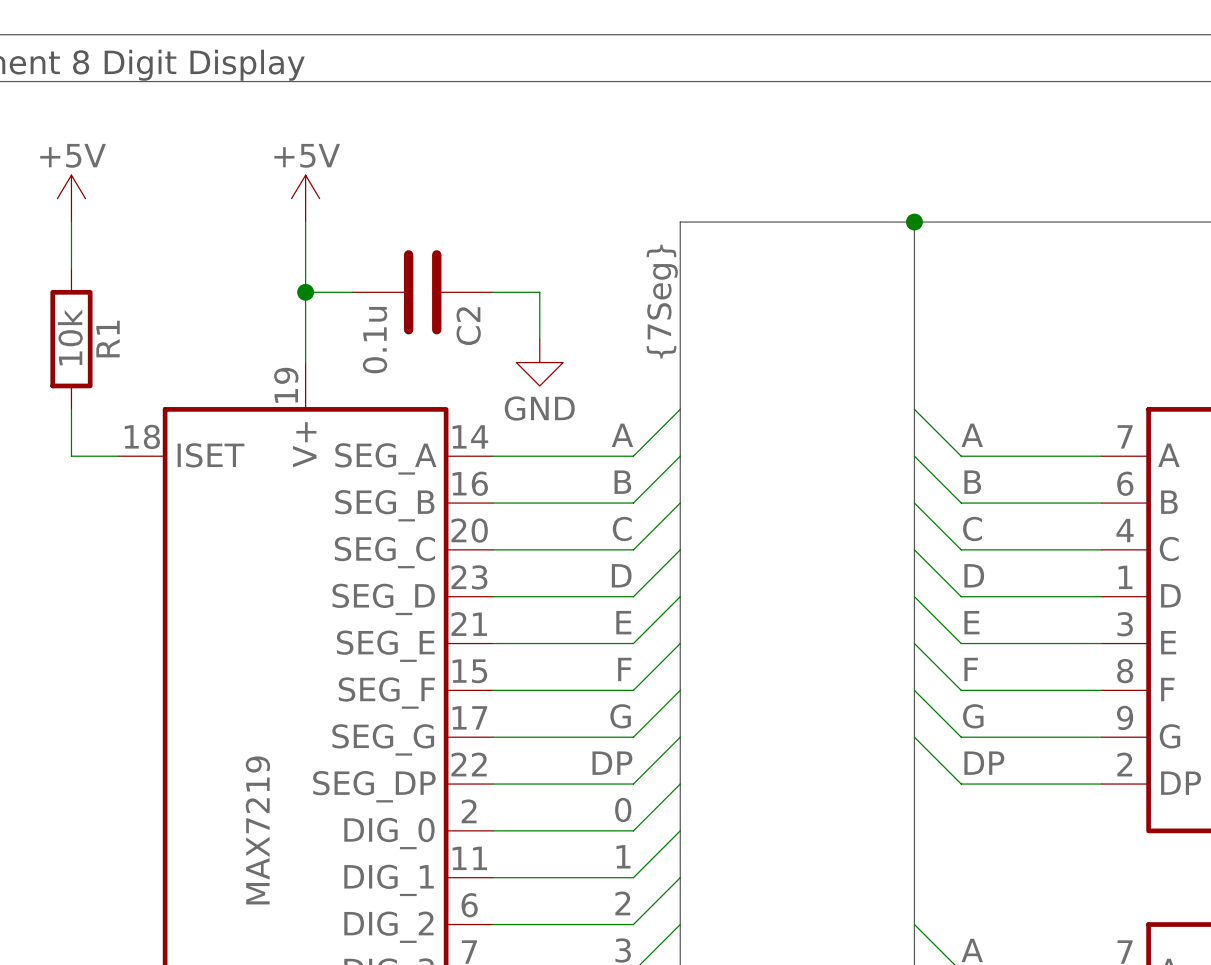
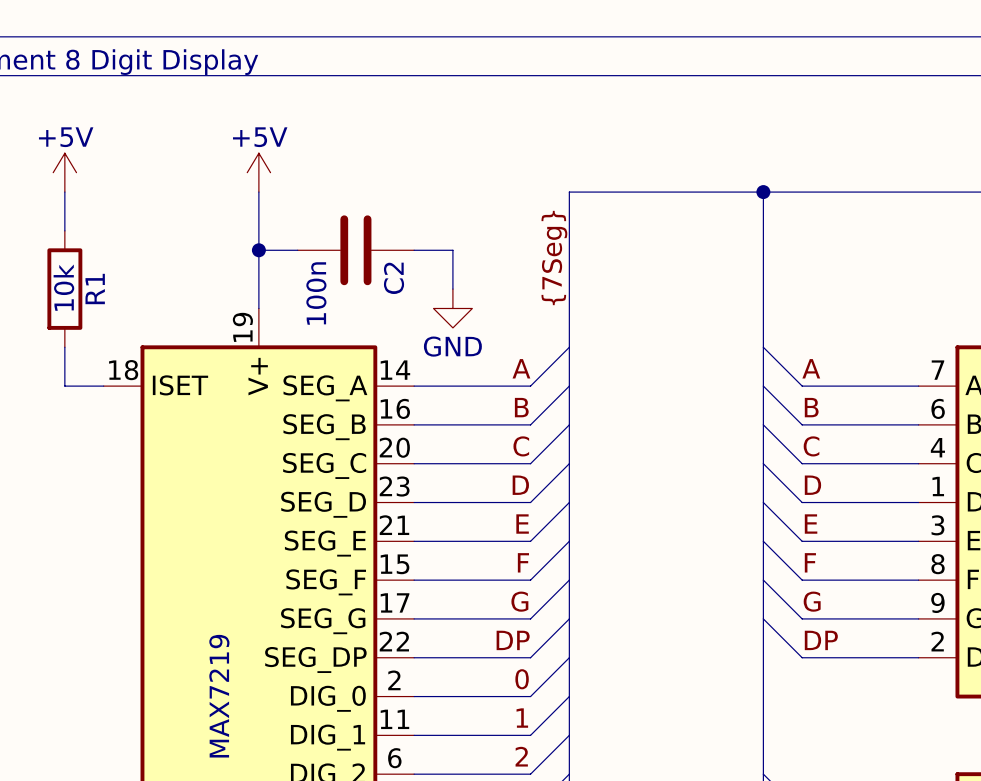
C2 value: 0.1u (375, 340) -> 100n (316, 293)

